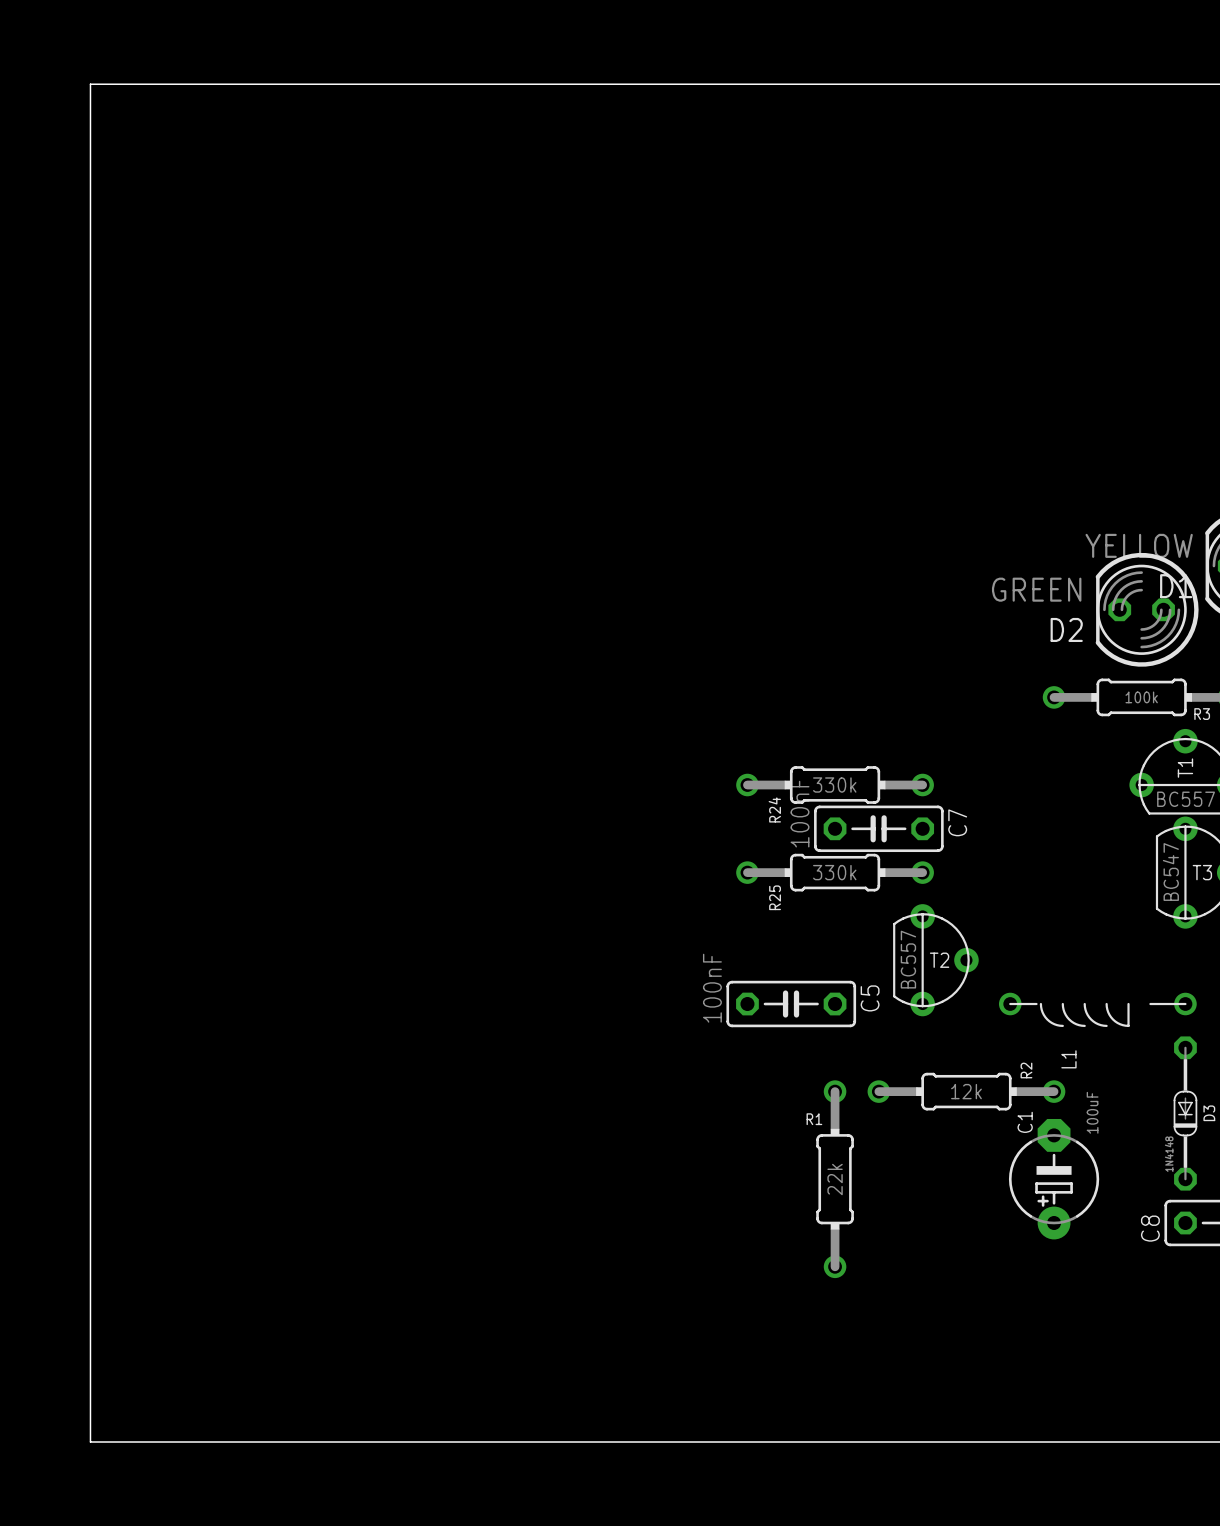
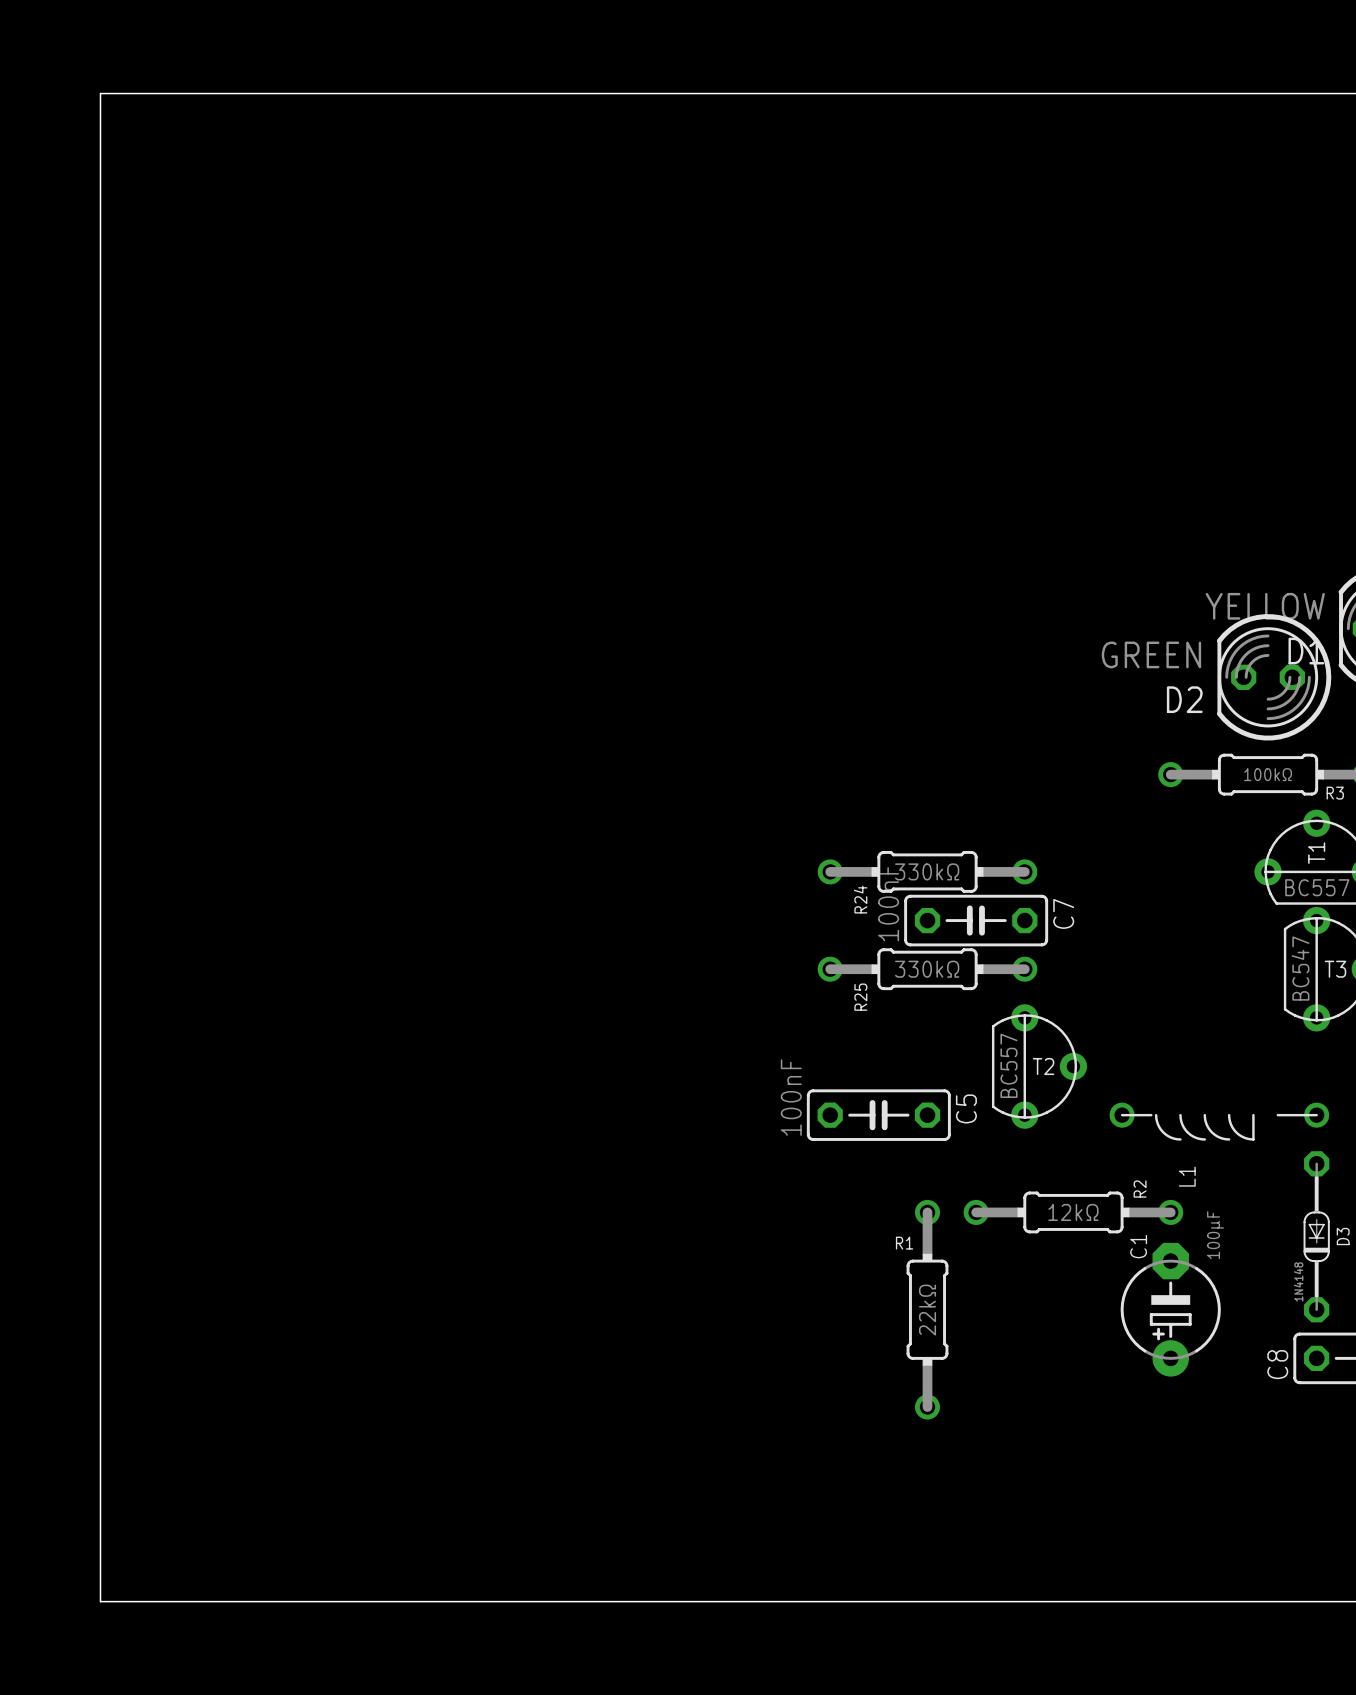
R3 value: 100k (1141, 697) -> 100kΩ (1268, 774)
R24 value: 330k (834, 785) -> 330kΩ (927, 871)
R25 value: 330k (834, 872) -> 330kΩ (927, 969)
R2 value: 12k (966, 1091) -> 12kΩ (1073, 1212)
C1 value: 100uF (1092, 1112) -> 100μF (1215, 1235)
R1 value: 22k (835, 1179) -> 22kΩ (927, 1310)

